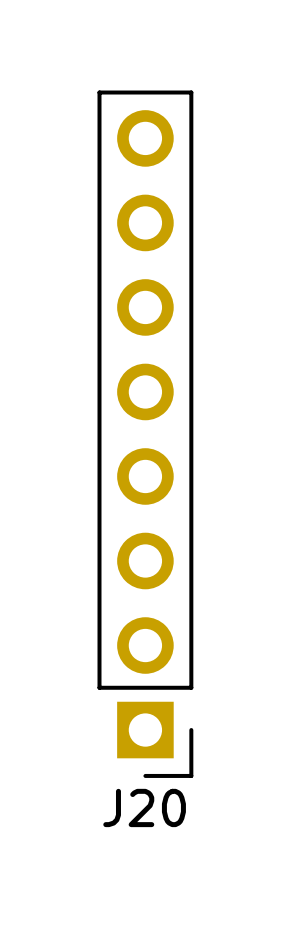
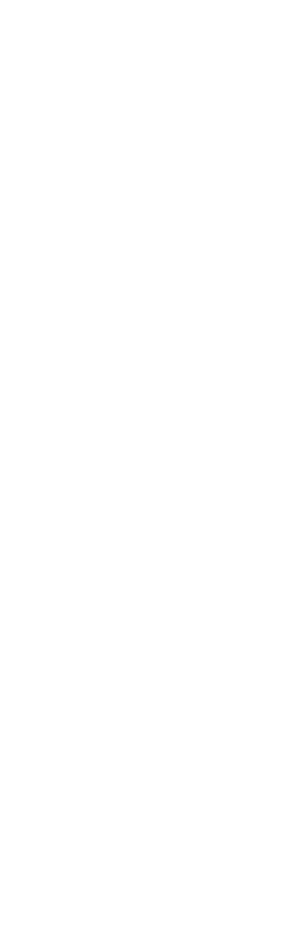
J20: (145, 434) -> none

